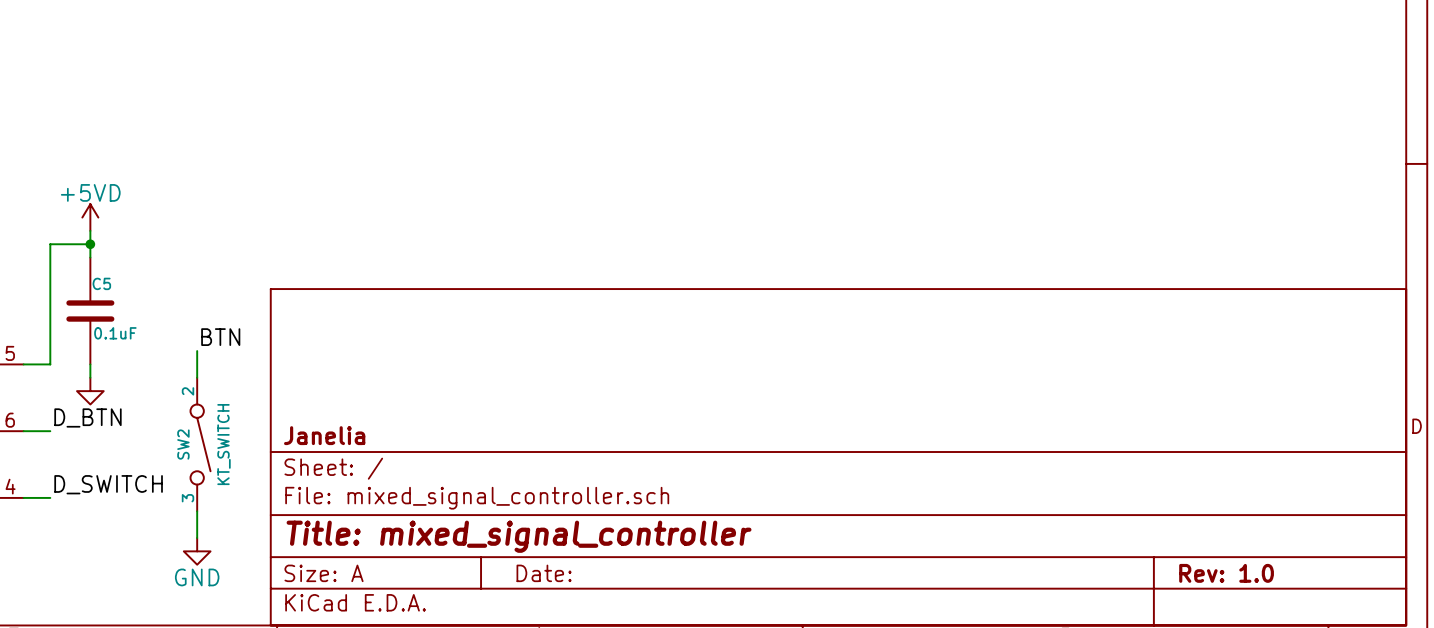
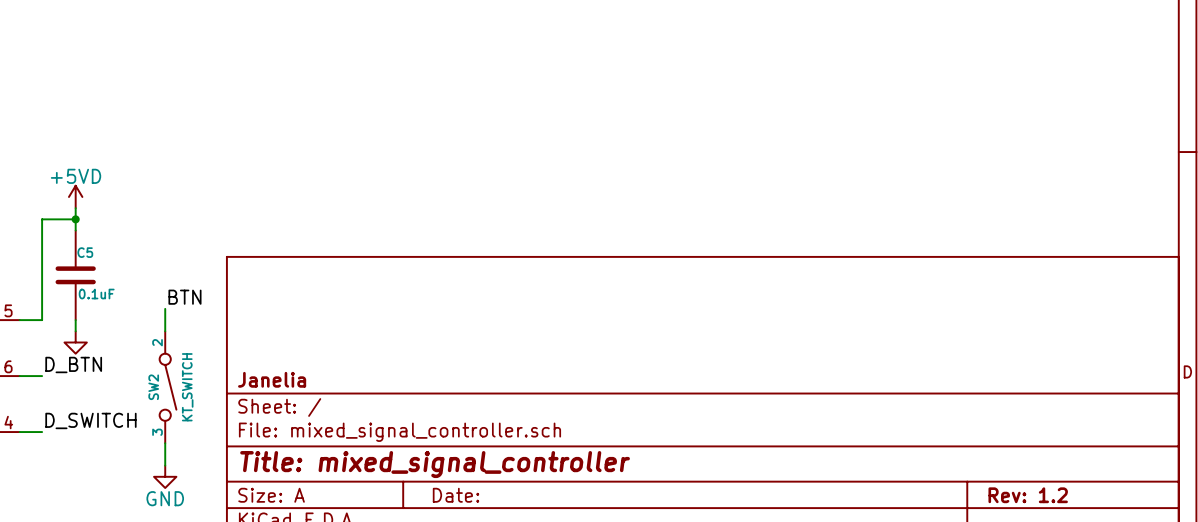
title block: Rev: 1.0 (1226, 573) -> Rev: 1.2 (1028, 495)

